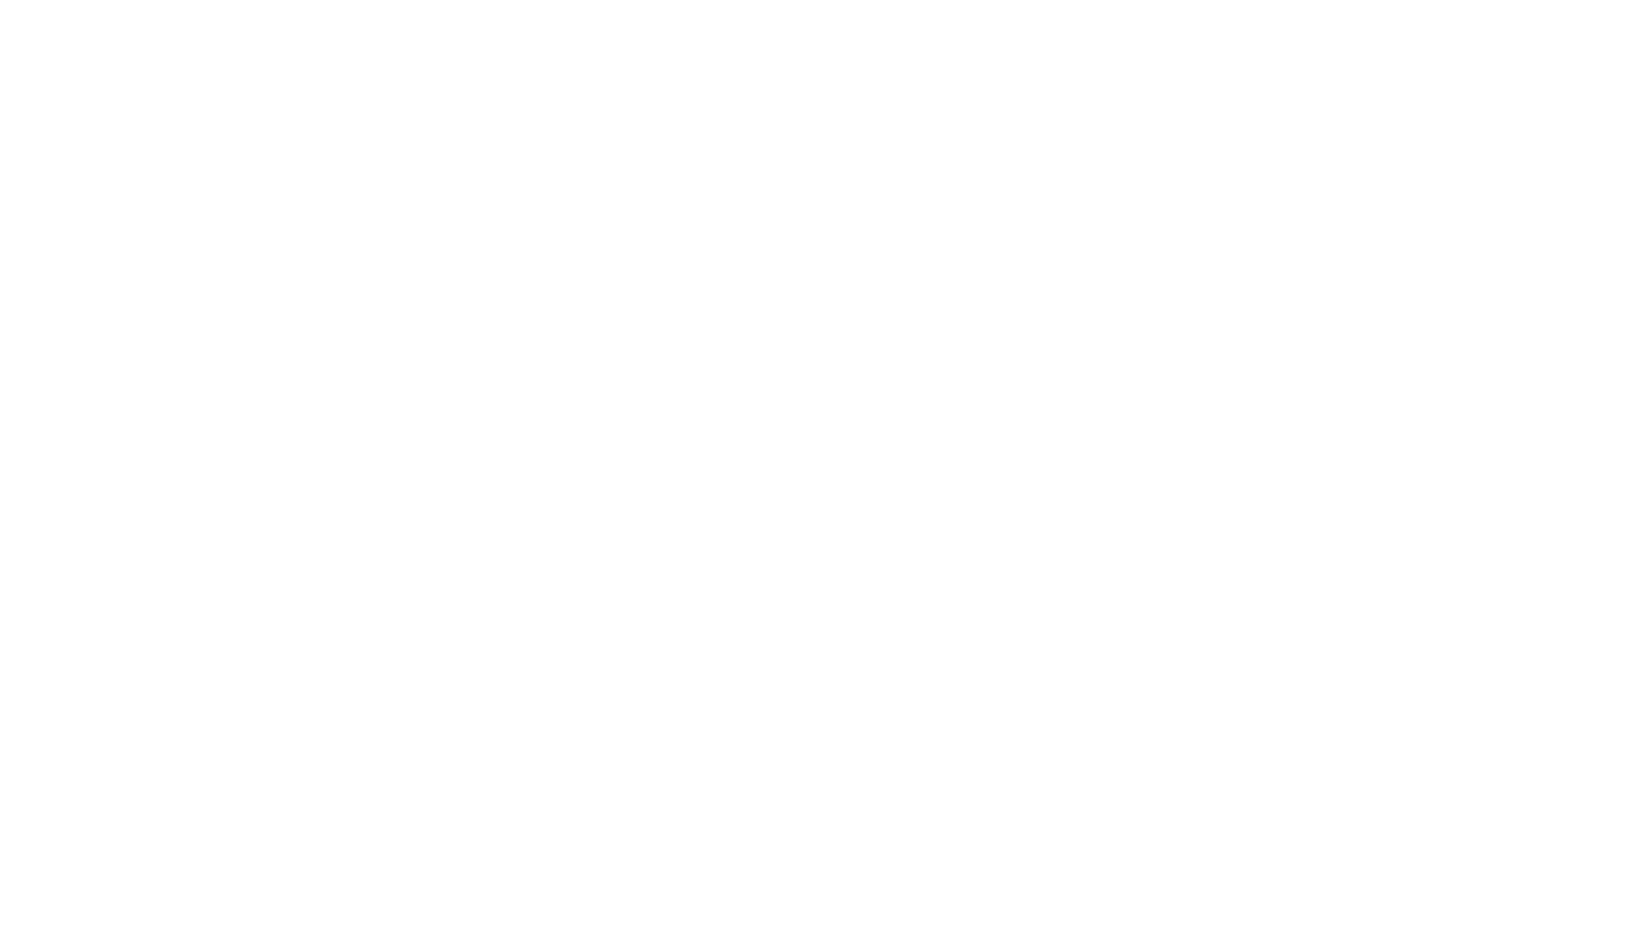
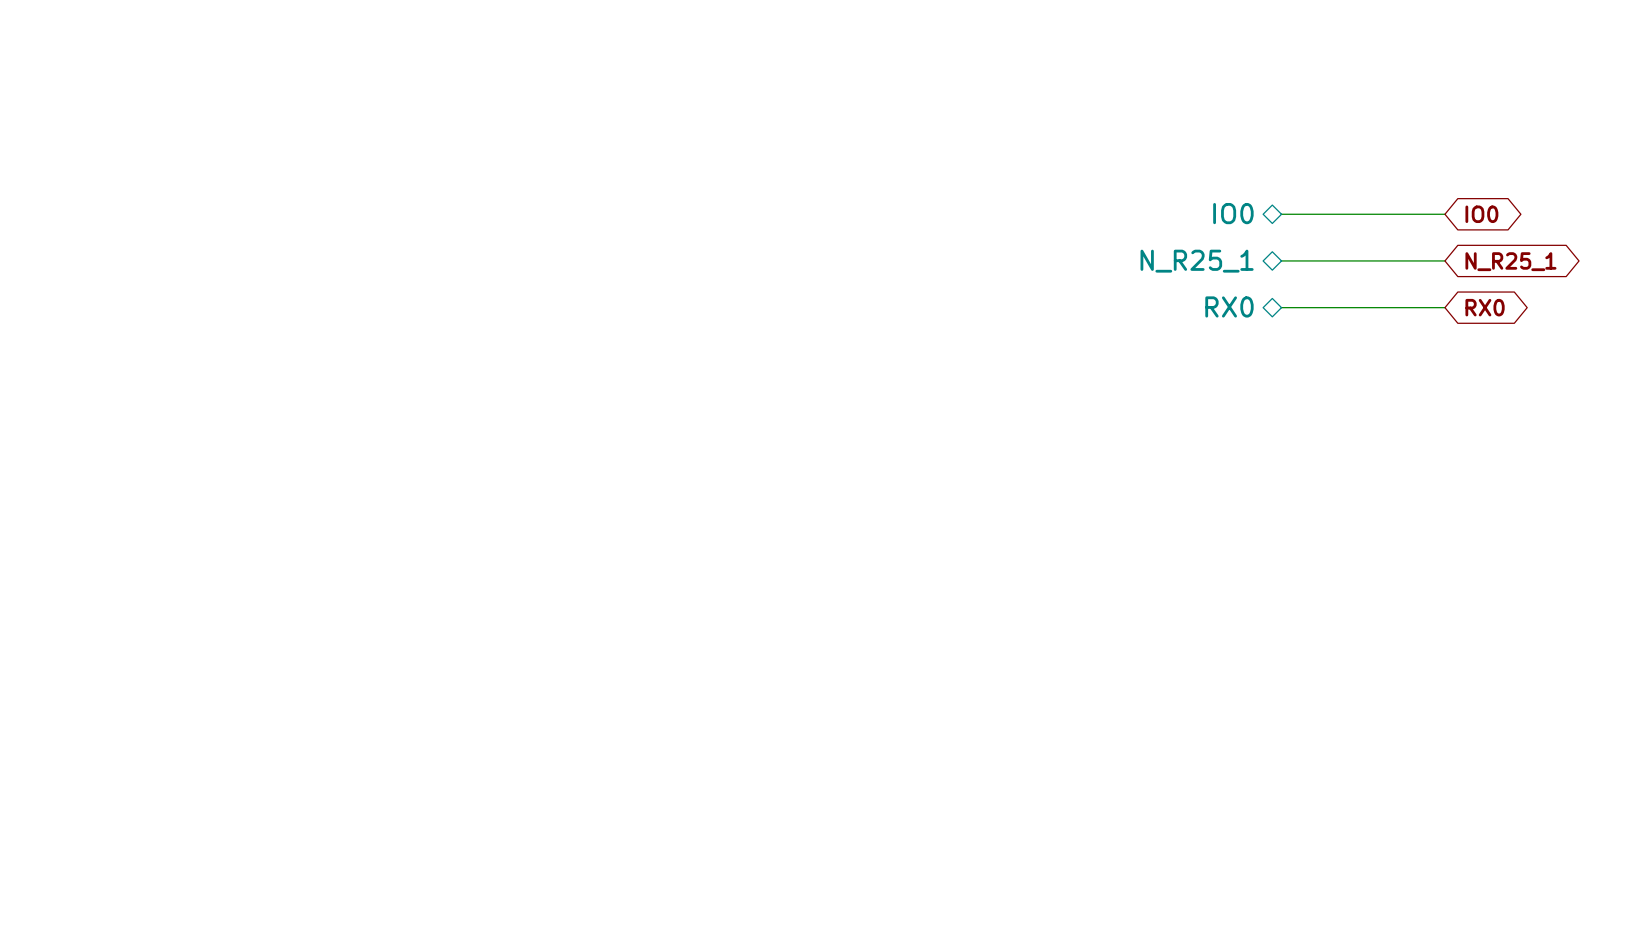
sheet pin: none -> IO0 (1233, 213)
wire: none -> (1281, 214) (1444, 214)
global label: none -> IO0 (1481, 214)
wire: none -> (1281, 260) (1444, 260)
sheet pin: none -> N_R25_1 (1197, 261)
global label: none -> N_R25_1 (1510, 261)
sheet pin: none -> RX0 (1229, 306)
wire: none -> (1281, 307) (1444, 307)
global label: none -> RX0 (1485, 307)

